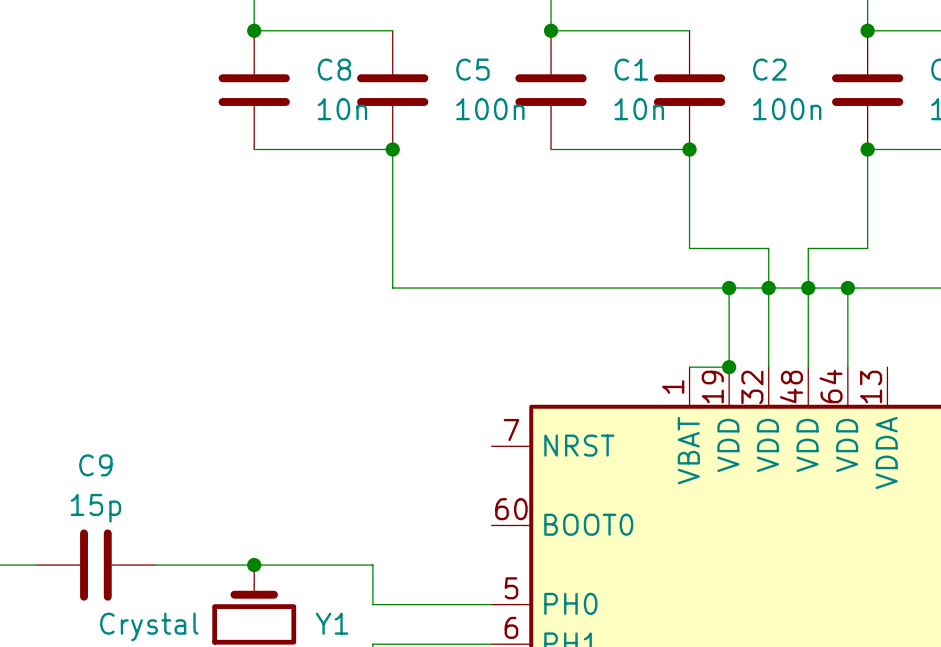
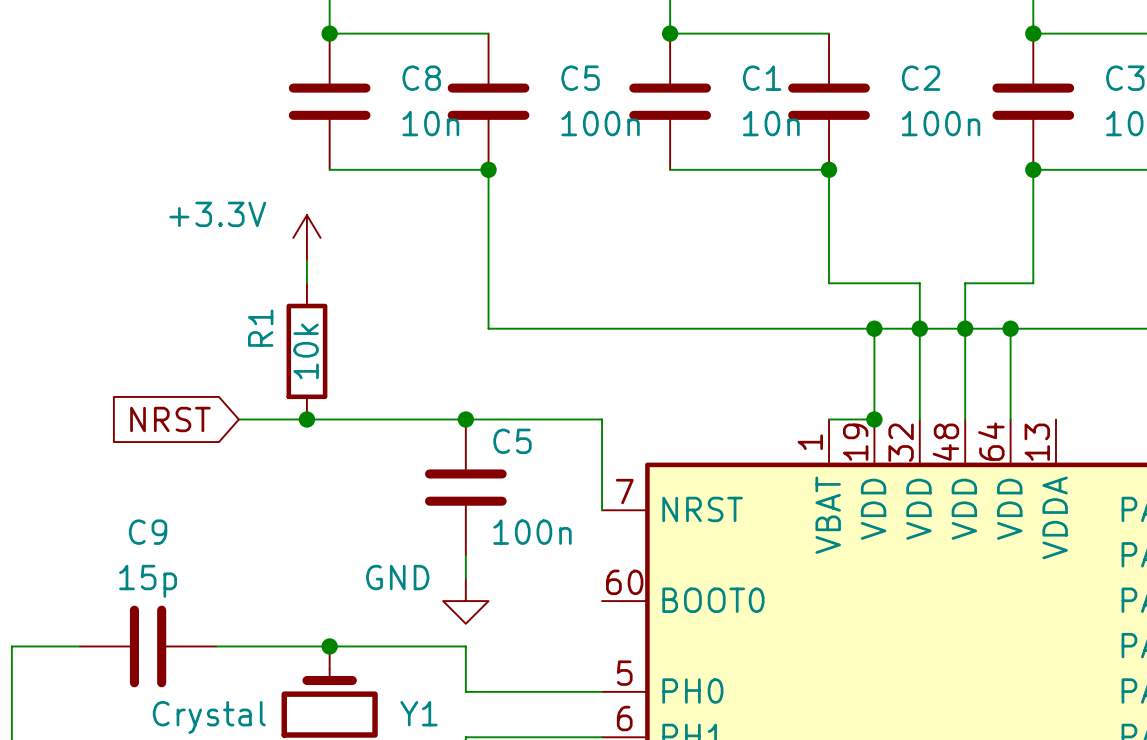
power symbol: none -> +3.3V (306, 237)
wire: none -> (306, 260) (306, 283)
R1: none -> 10k (306, 351)
global label: none -> NRST (170, 419)
wire: none -> (238, 419) (602, 419) (602, 510)
junction: none -> (306, 419)
junction: none -> (465, 419)
C5: none -> 100n (465, 487)
wire: none -> (465, 555) (465, 578)
power symbol: none -> GND (465, 601)

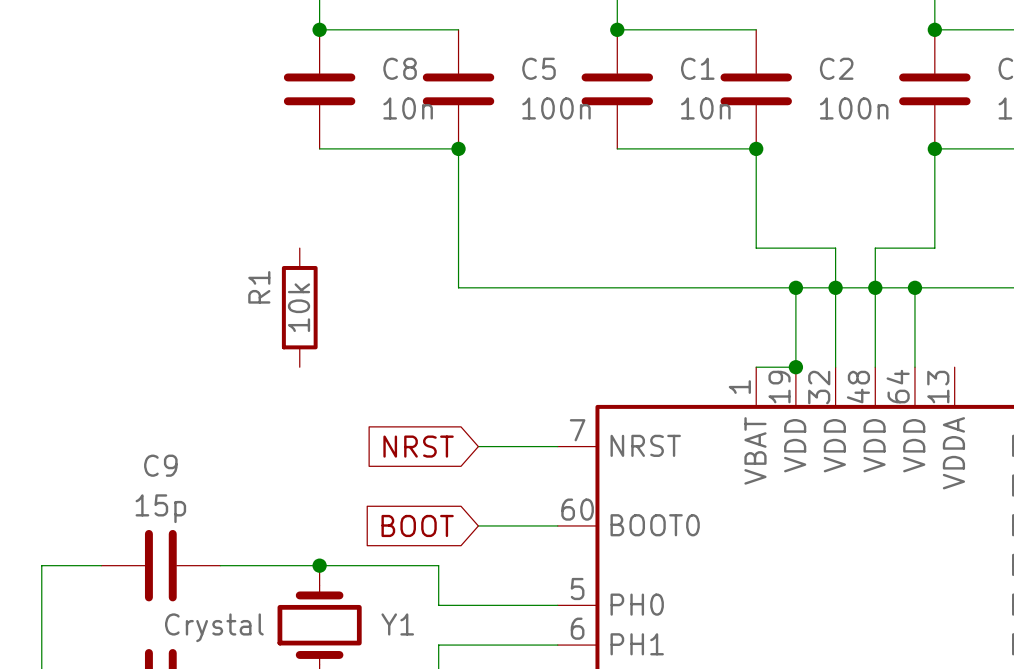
power symbol: +3.3V (306, 237) -> none
wire: (306, 260) (306, 283) -> none
global label position: NRST (170, 419) -> NRST (418, 446)
wire: (238, 419) (602, 419) (602, 510) -> (478, 446) (557, 446)
junction: (306, 419) -> none
junction: (465, 419) -> none
C5: 100n (465, 487) -> none
wire: (465, 555) (465, 578) -> none
global label: none -> BOOT (417, 525)
power symbol: GND (465, 601) -> none
wire: none -> (478, 525) (557, 525)

